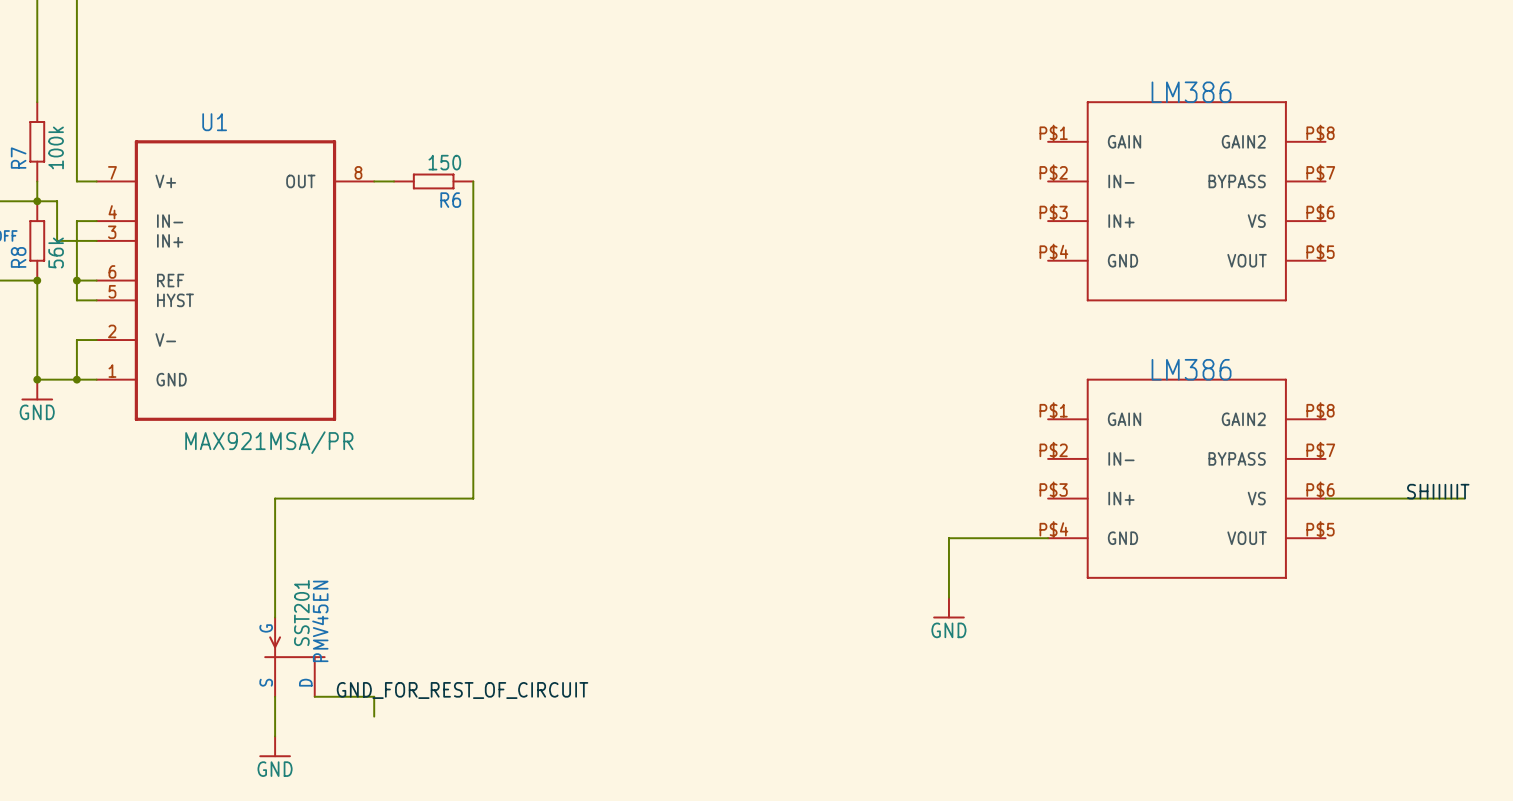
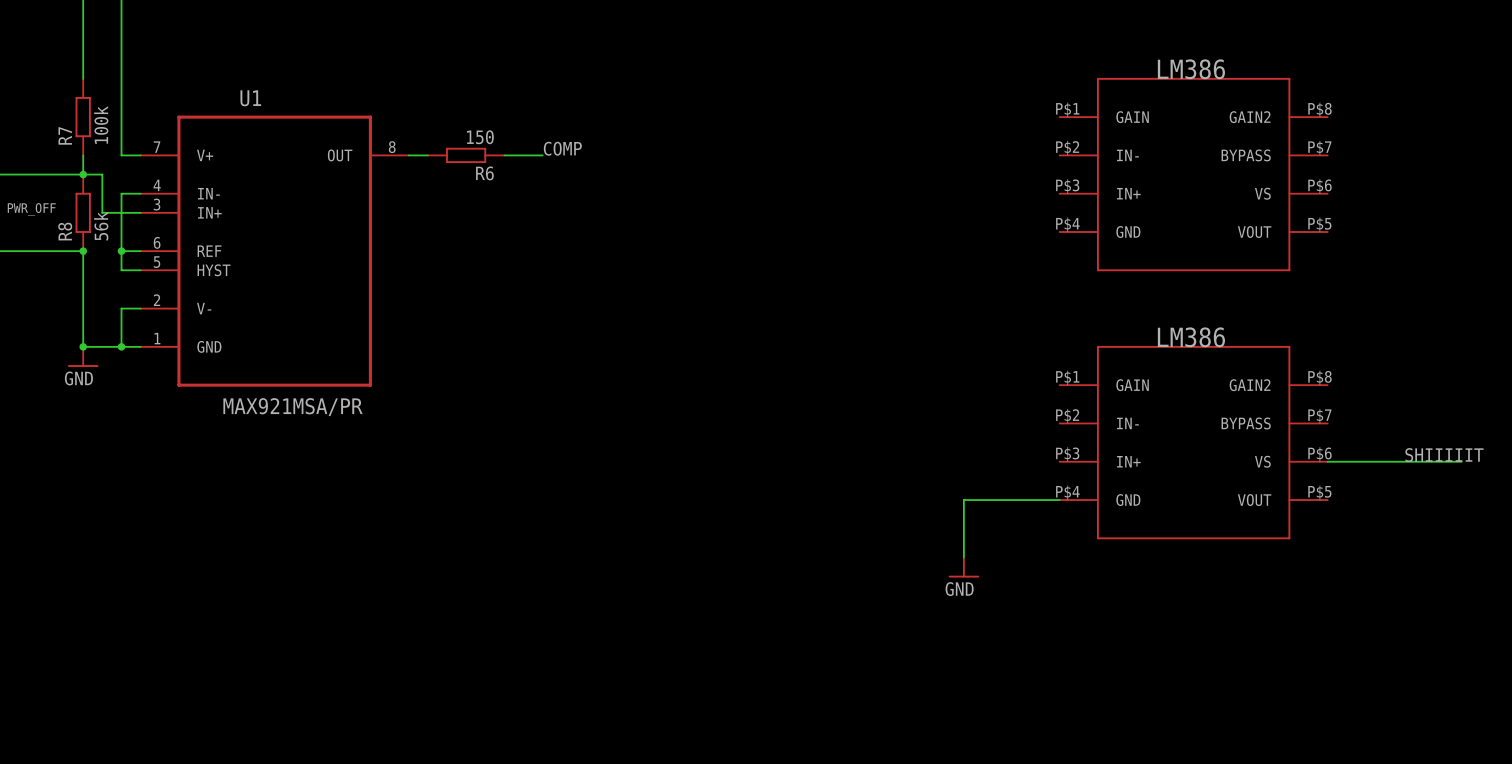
label: none -> COMP (562, 148)
wire: (473, 181) (473, 498) (275, 498) (275, 617) -> (504, 155) (542, 155)
PMV45EN: SST201 (294, 657) -> none
label: GND_FOR_REST_OF_CIRCUIT (462, 690) -> none
wire: (275, 696) (275, 736) -> none
wire: (314, 696) (374, 696) (374, 716) -> none
power symbol: GND (275, 746) -> none

